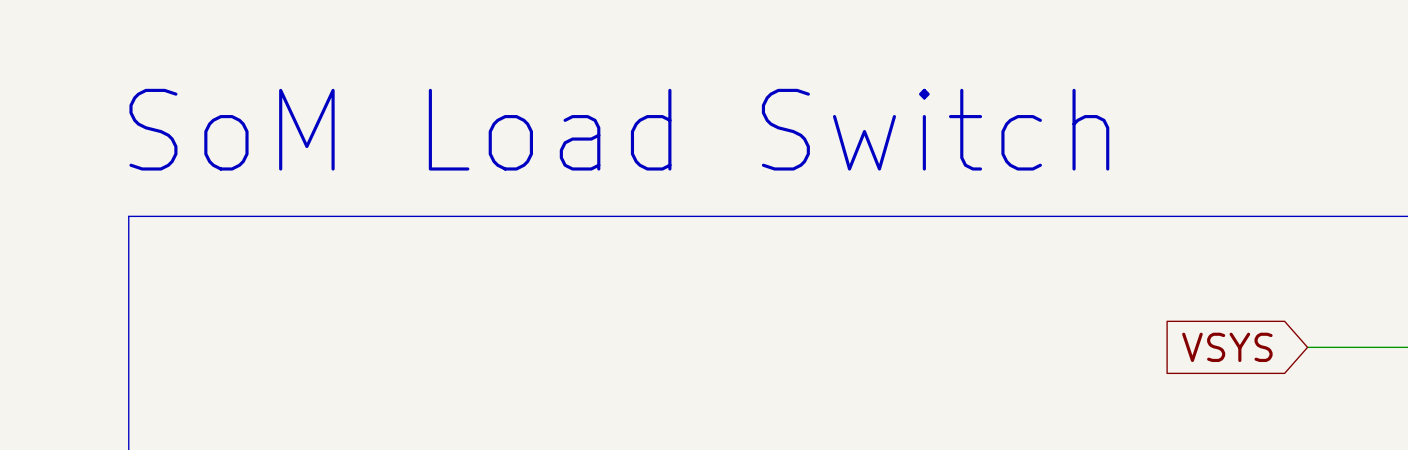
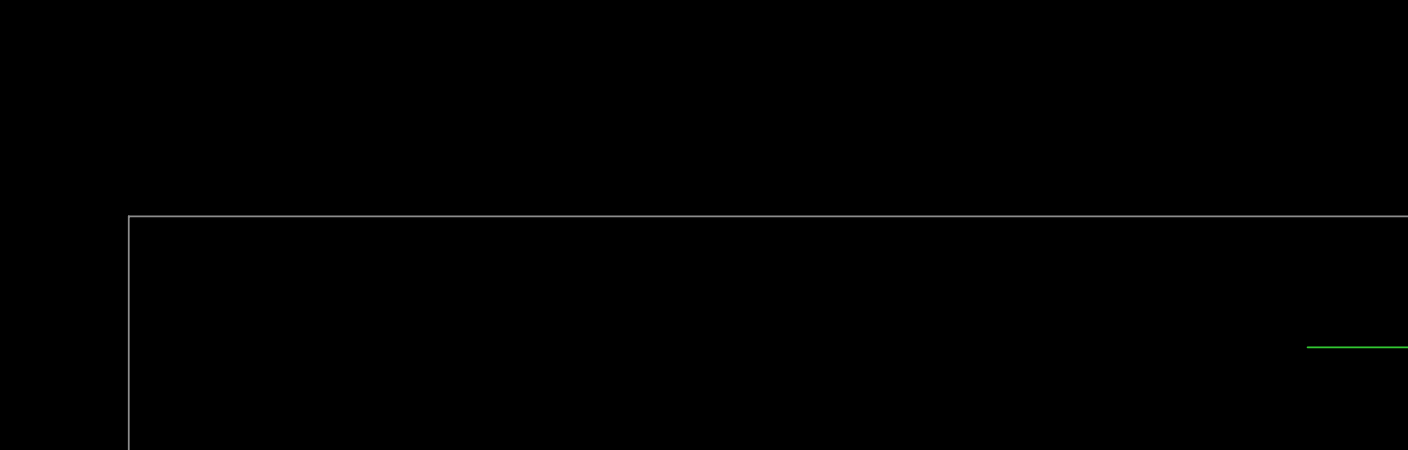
text: SoM Load Switch (619, 129) -> none
global label: VSYS (1227, 347) -> none

